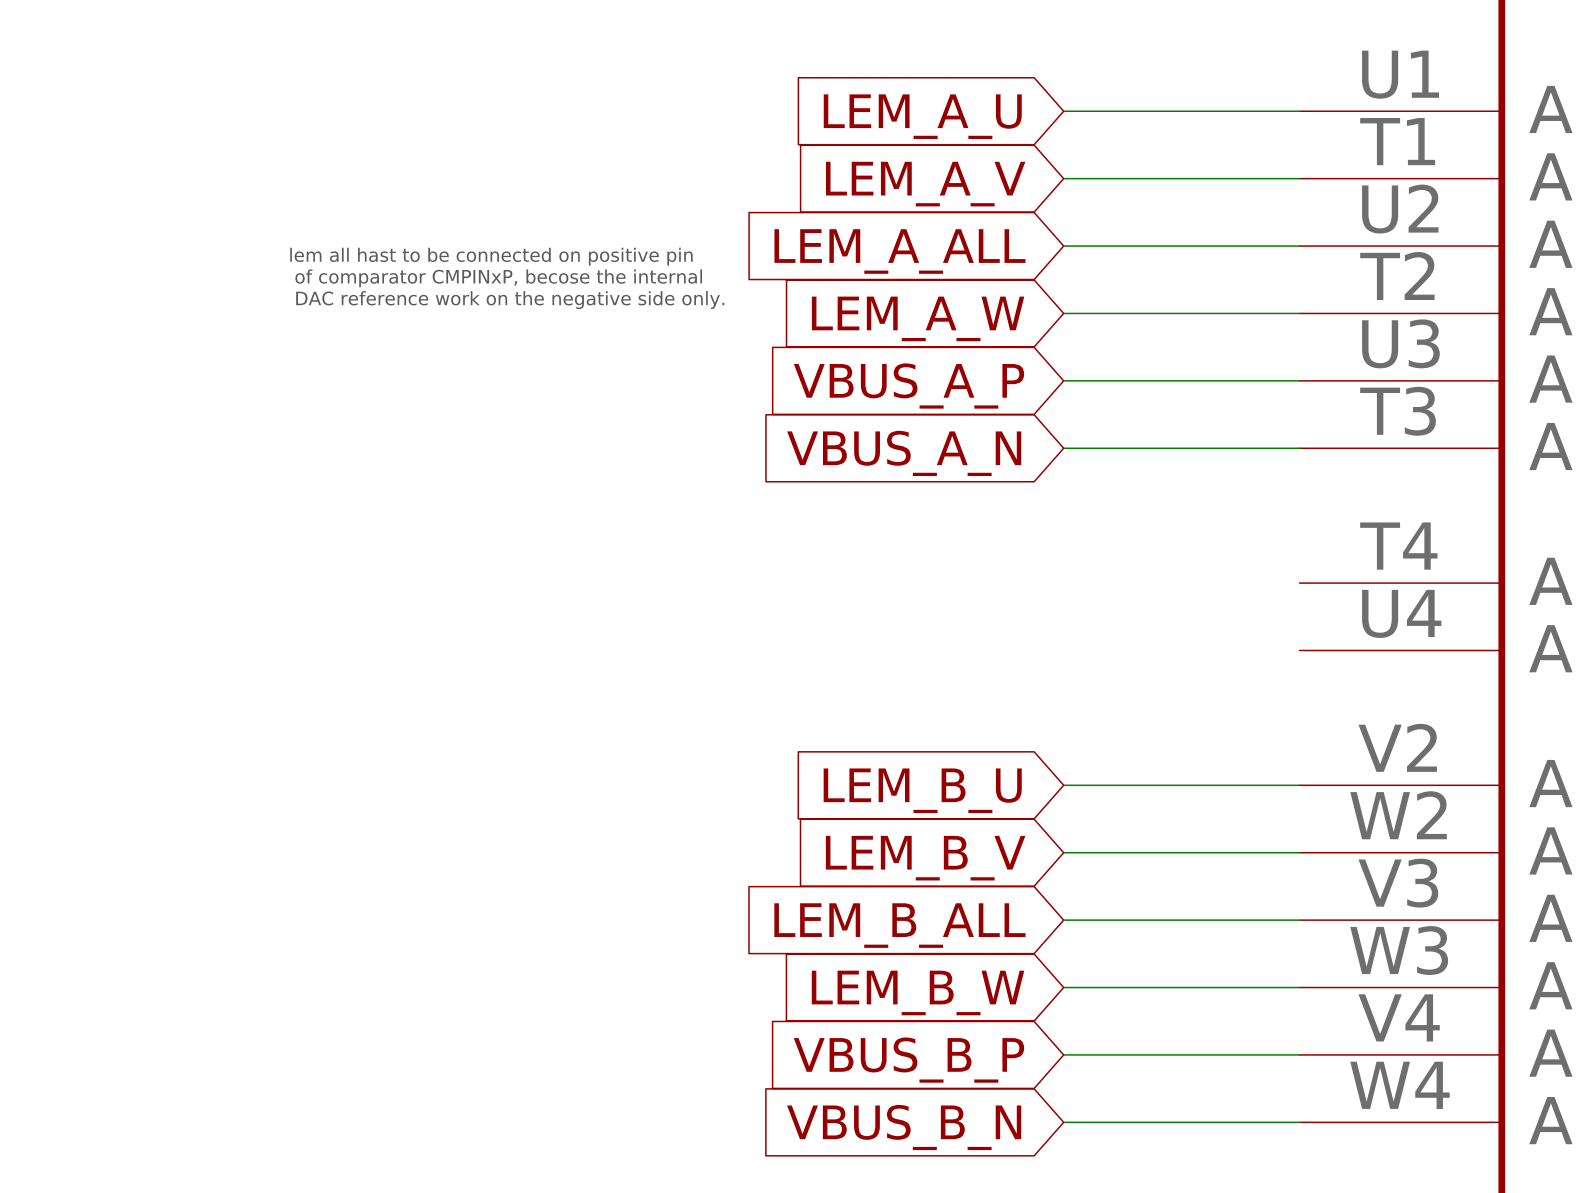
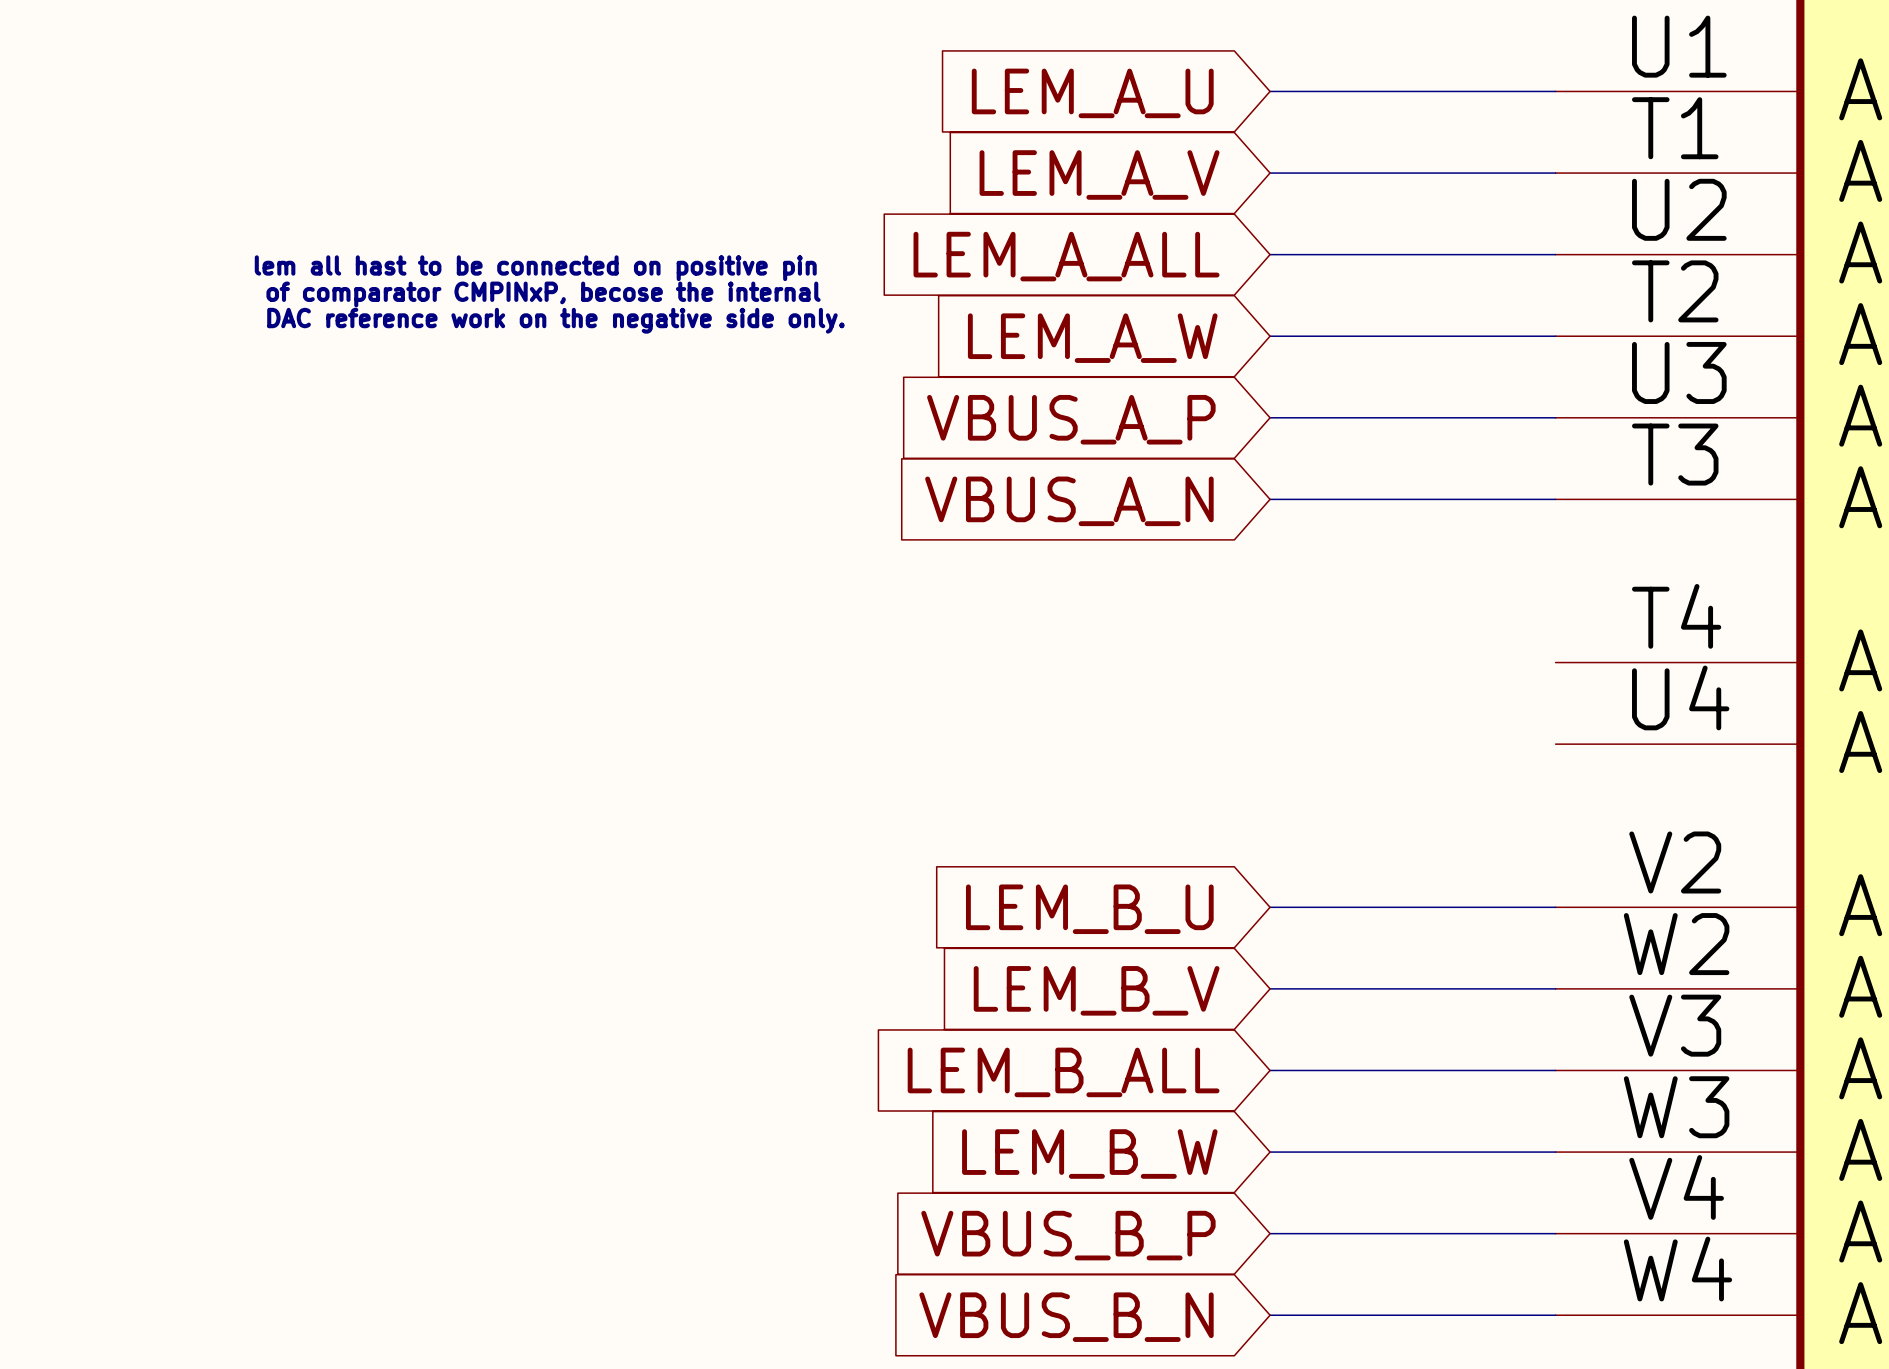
text position: lem all hast to be connected on positive pin (491, 256) -> lem all hast to be connected on positive pin (535, 268)
text position: of comparator CMPINxP, becose the internal (498, 278) -> of comparator CMPINxP, becose the internal (543, 294)
text position: DAC reference work on the negative side only. (510, 300) -> DAC reference work on the negative side only. (555, 320)

